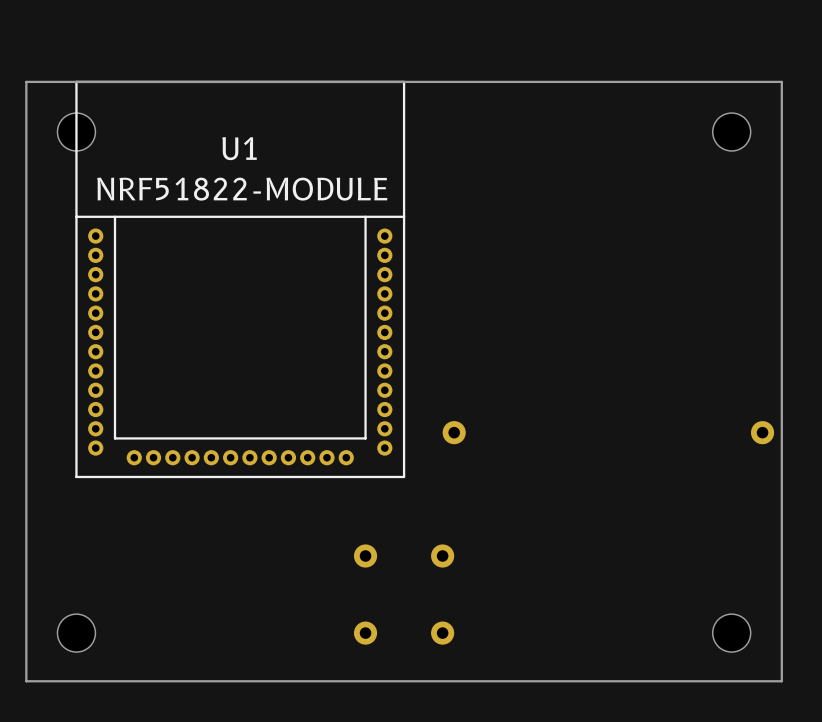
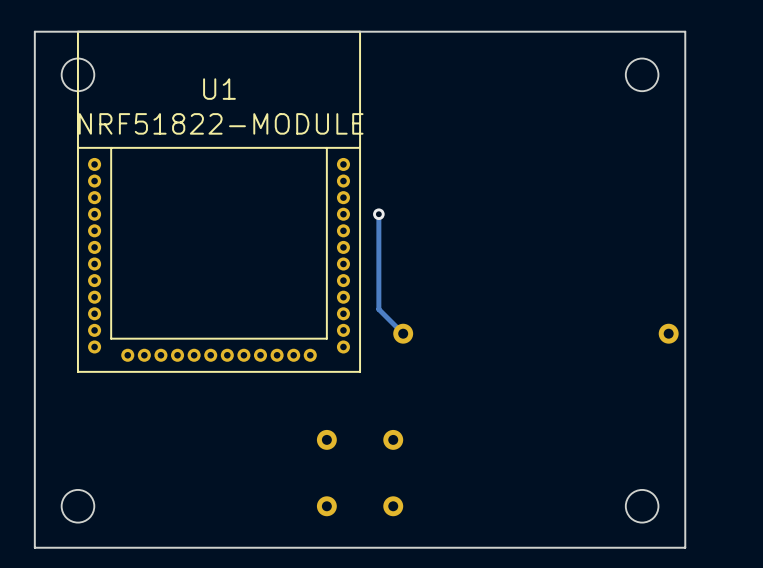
track: none -> (378, 214) (378, 309) (403, 333)
via: none -> (378, 214)

